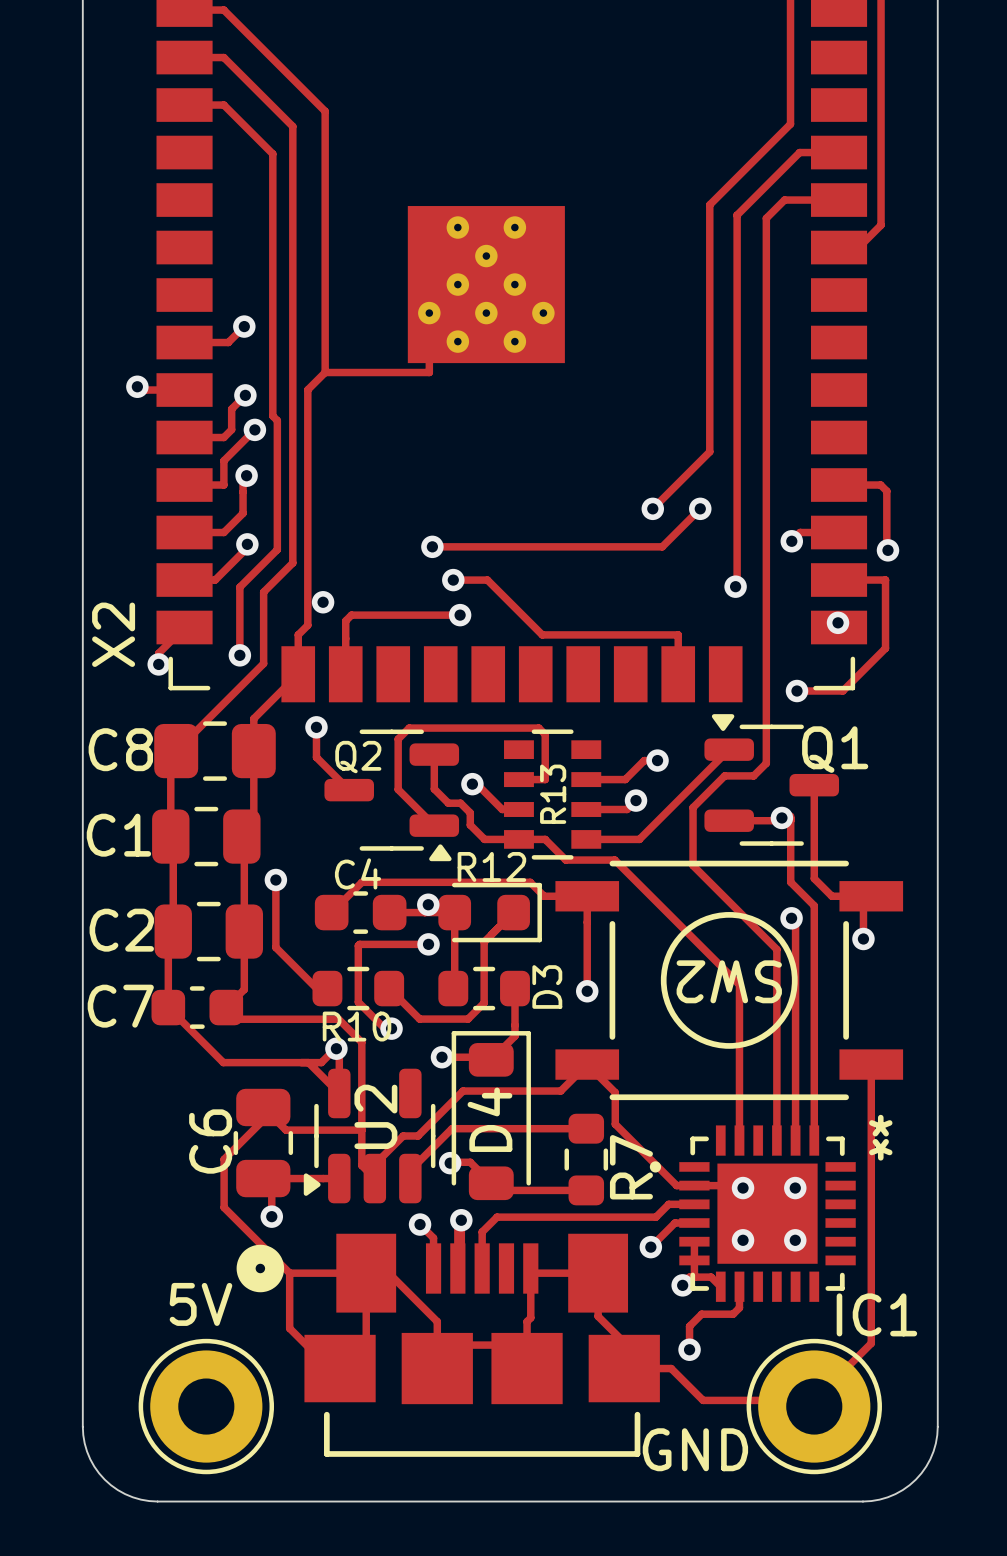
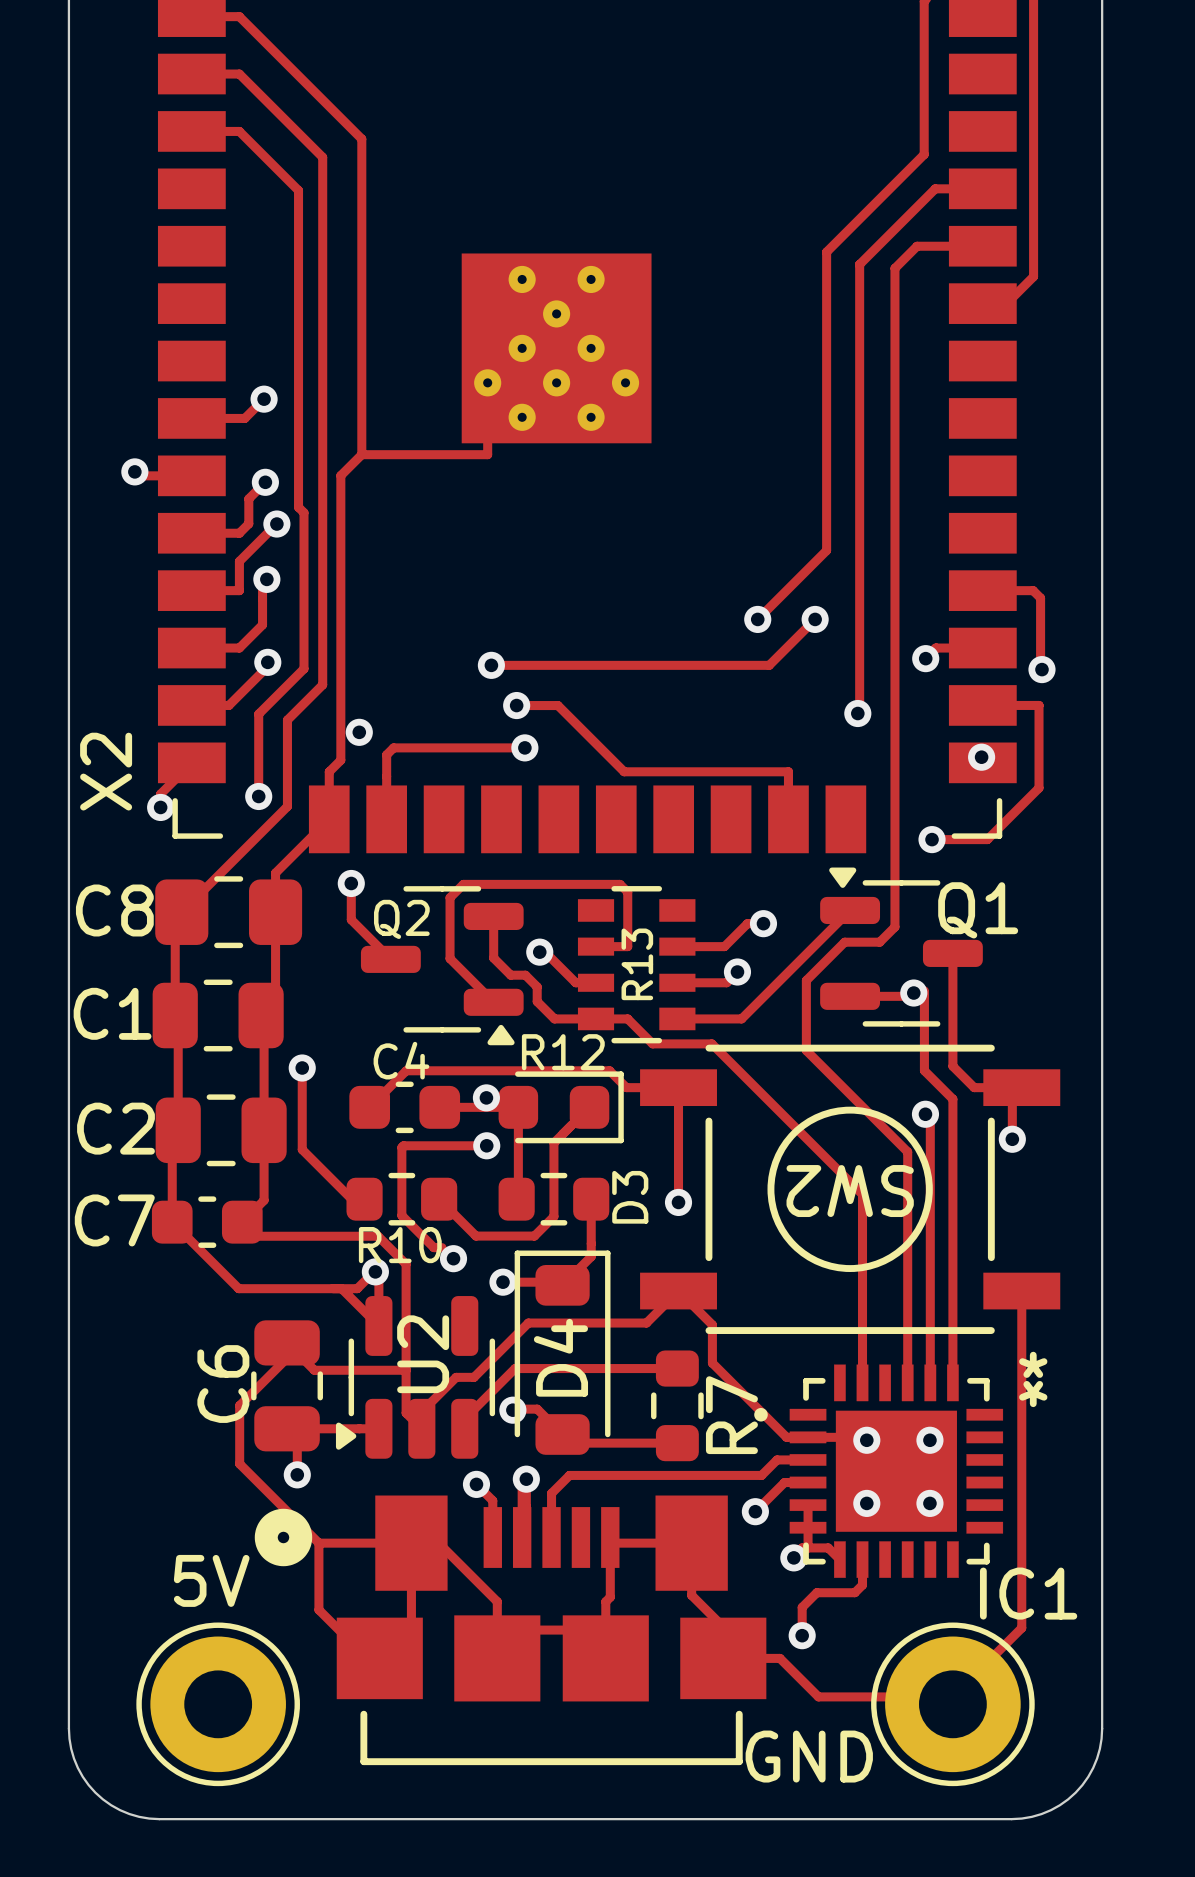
via position: (391, 1028) -> (453, 1258)

